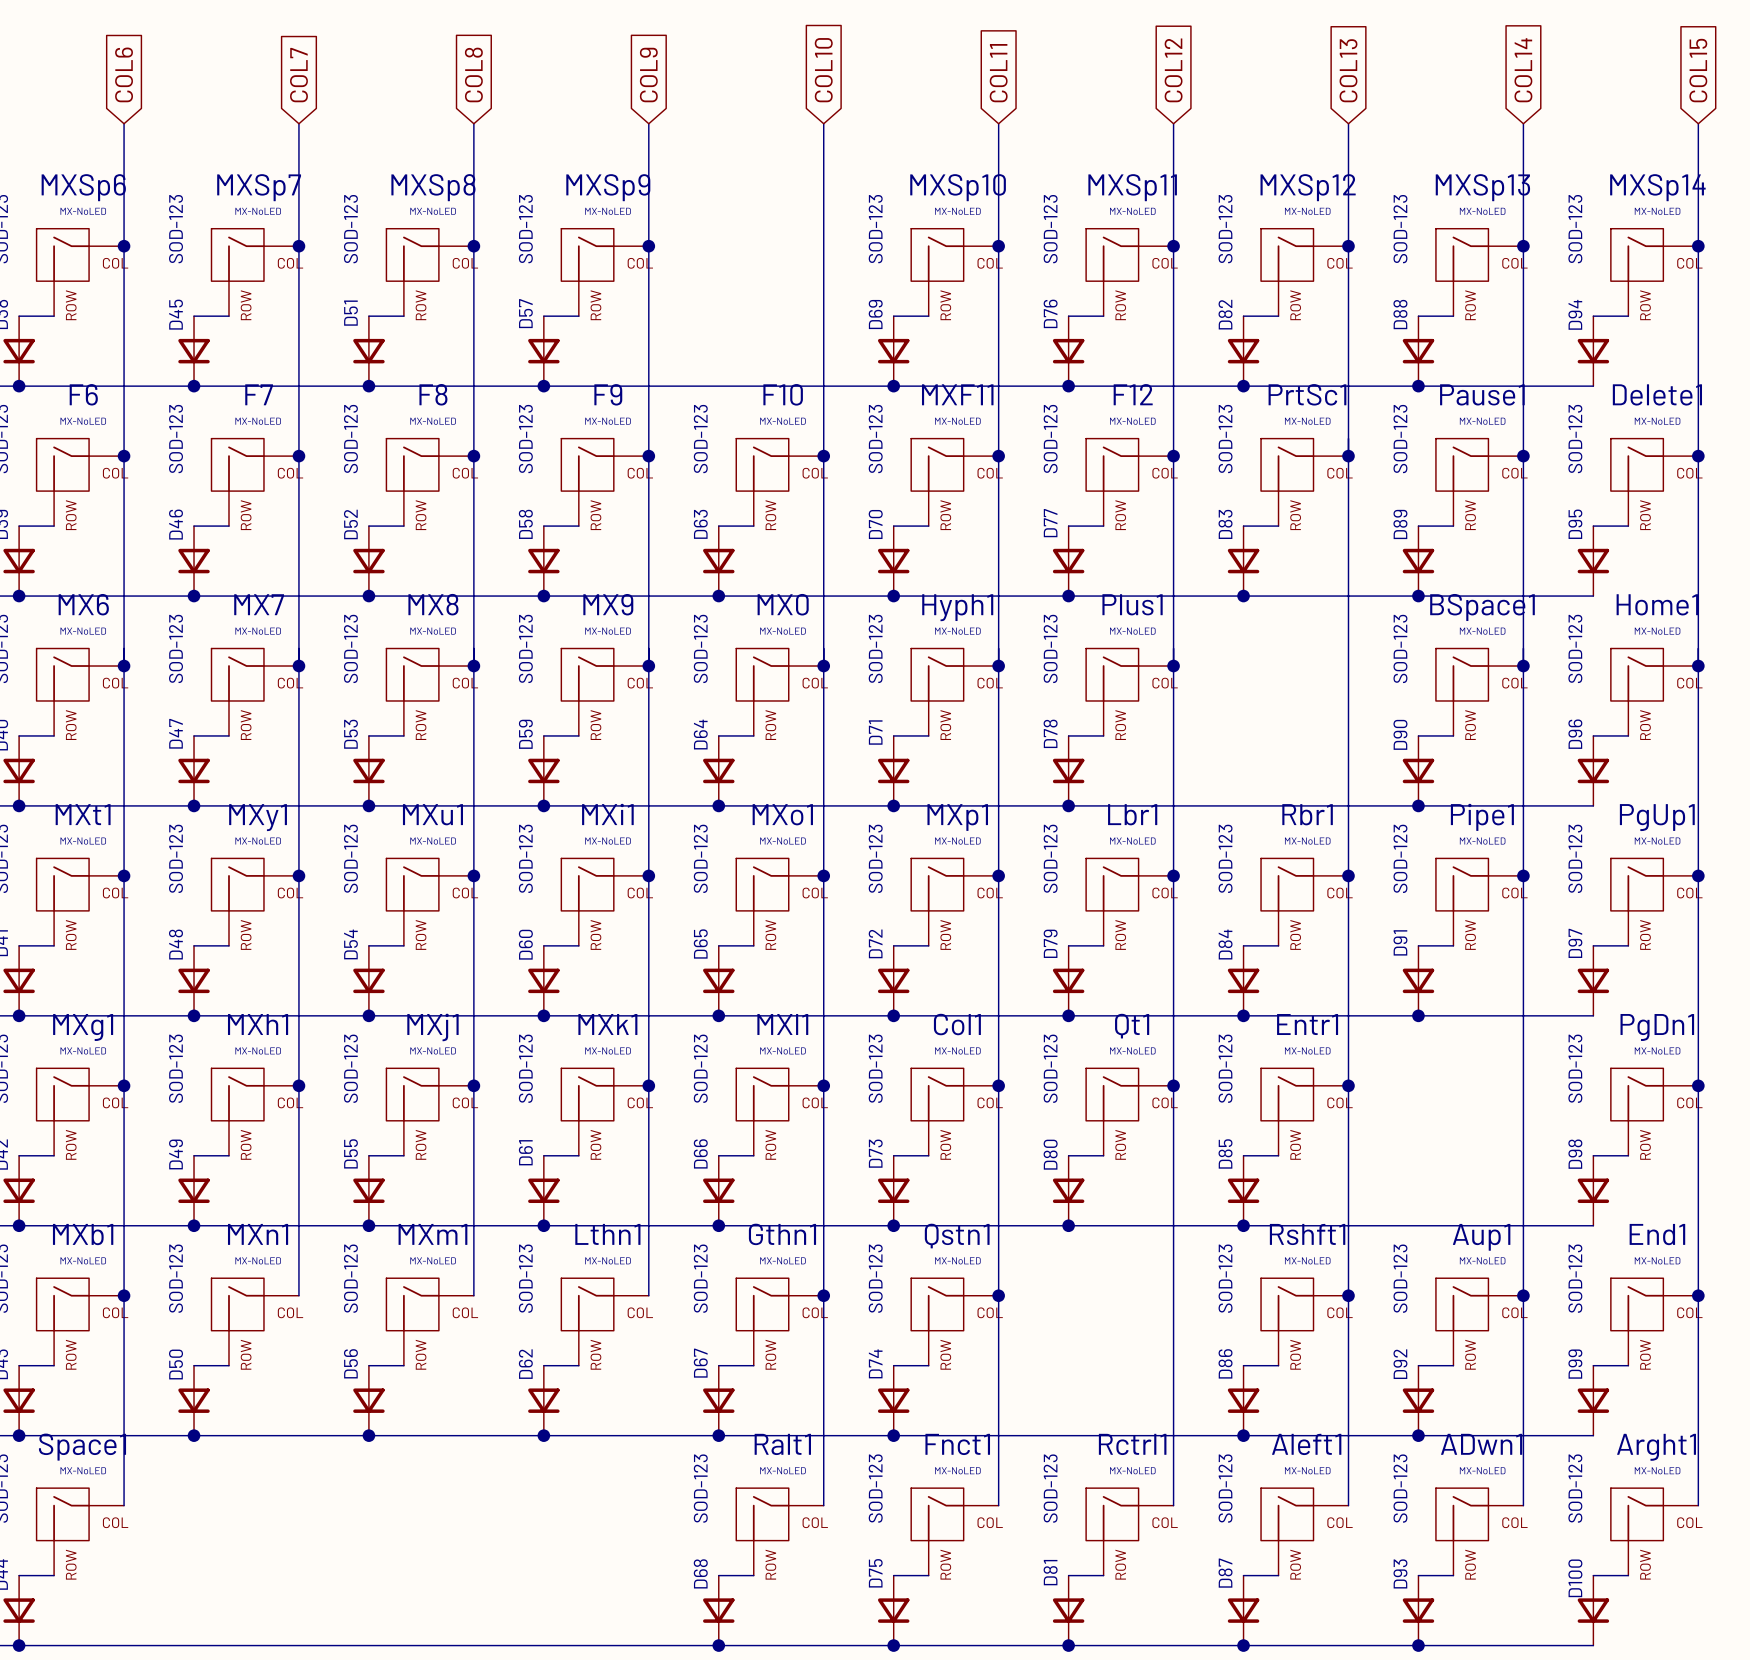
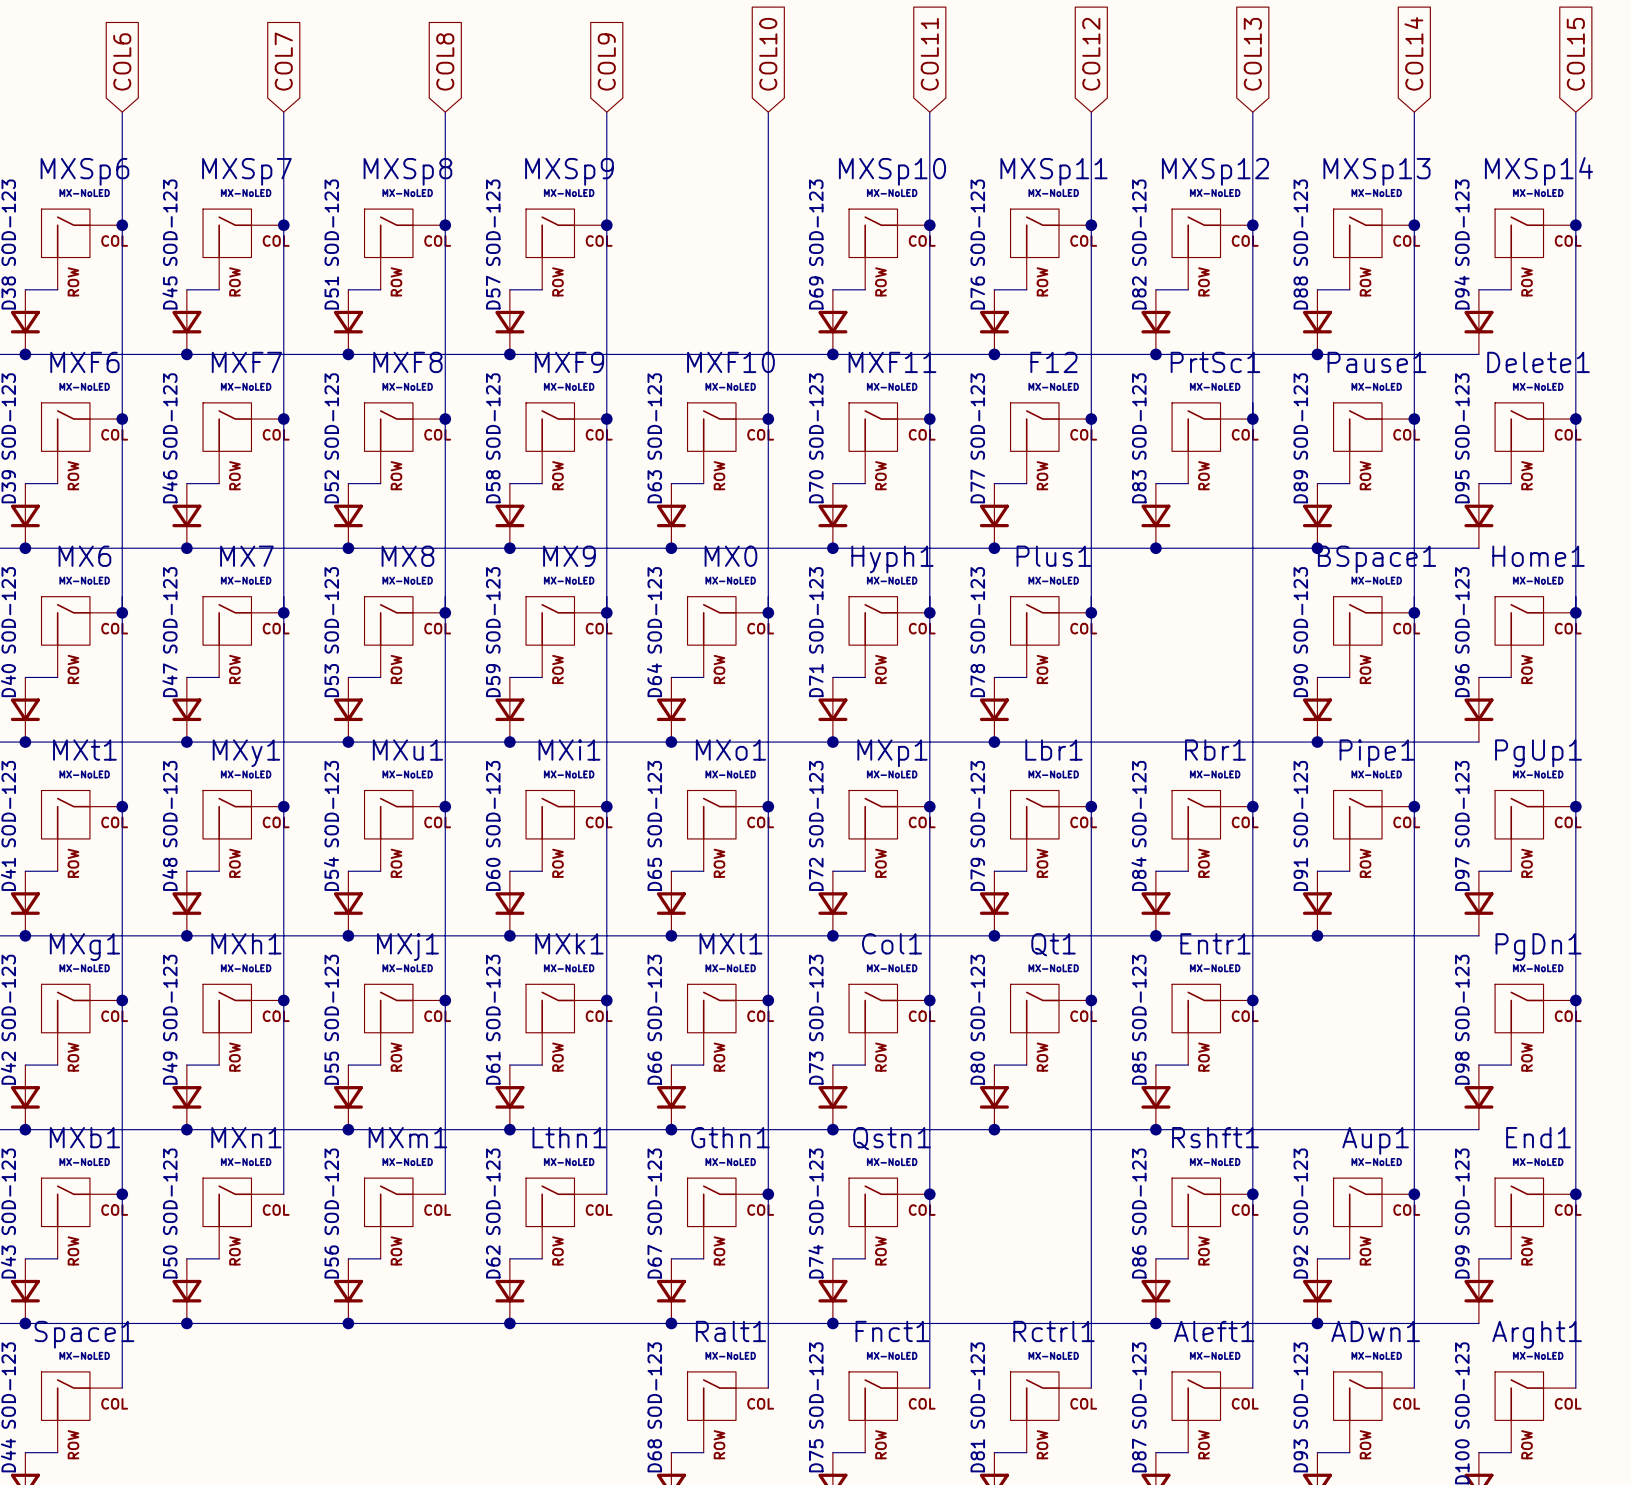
F6 name: F6 (83, 394) -> MXF6 (84, 362)
F7 name: F7 (259, 394) -> MXF7 (246, 362)
F8 name: F8 (433, 394) -> MXF8 (407, 362)
F9 name: F9 (608, 394) -> MXF9 (569, 362)
F10 name: F10 (783, 394) -> MXF10 (730, 362)

